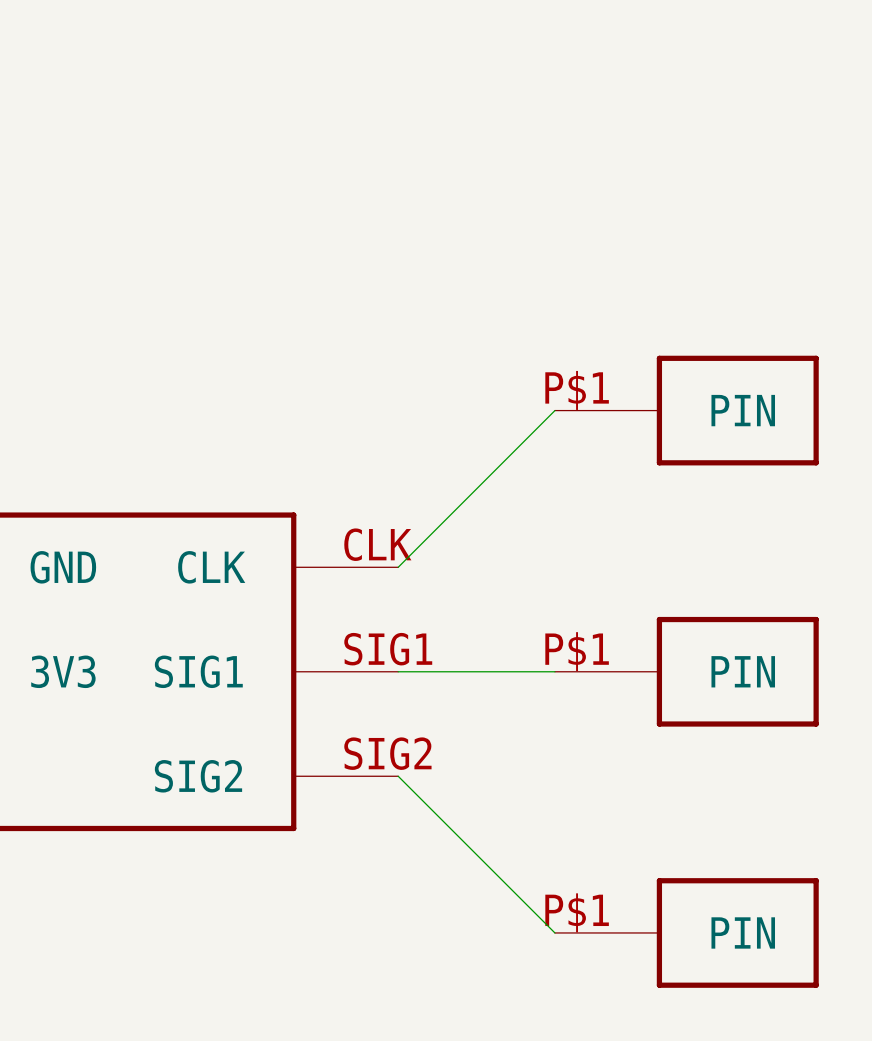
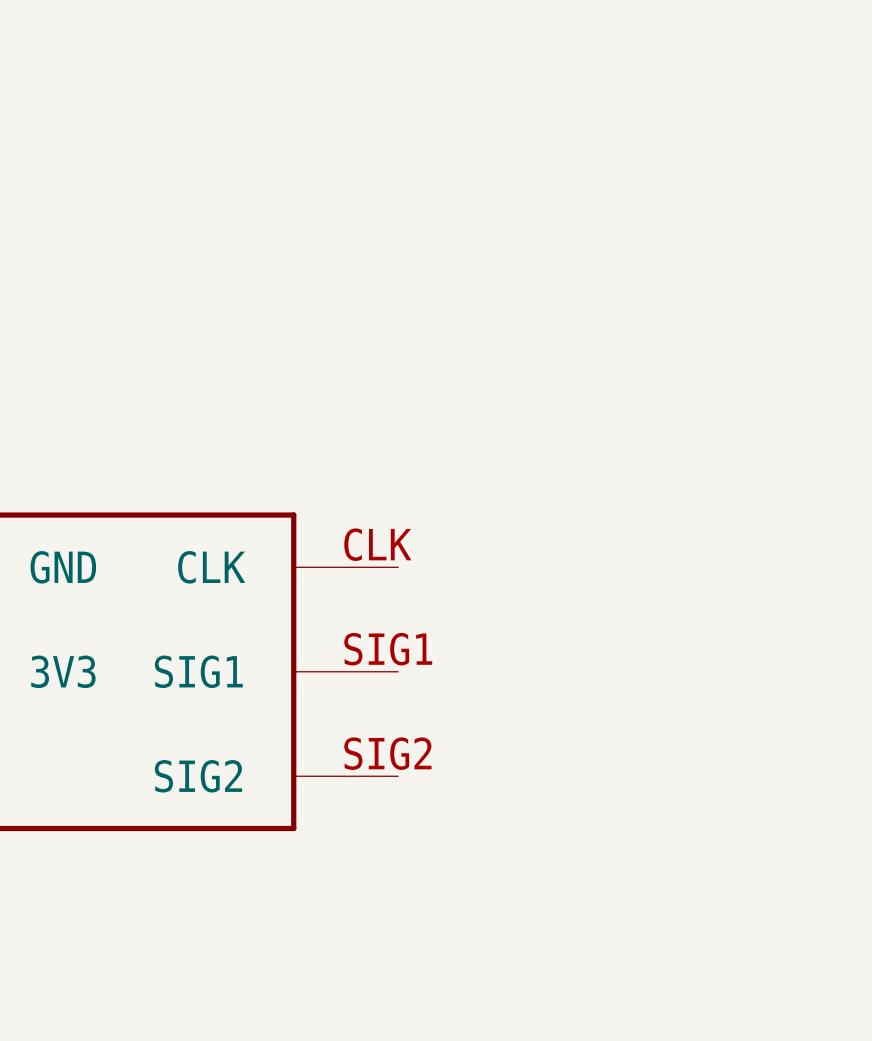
wire: (554, 410) (398, 567) -> none
part: (686, 410) -> none
wire: (398, 671) (554, 671) -> none
part: (686, 671) -> none
wire: (398, 776) (554, 932) -> none
part: (686, 932) -> none

